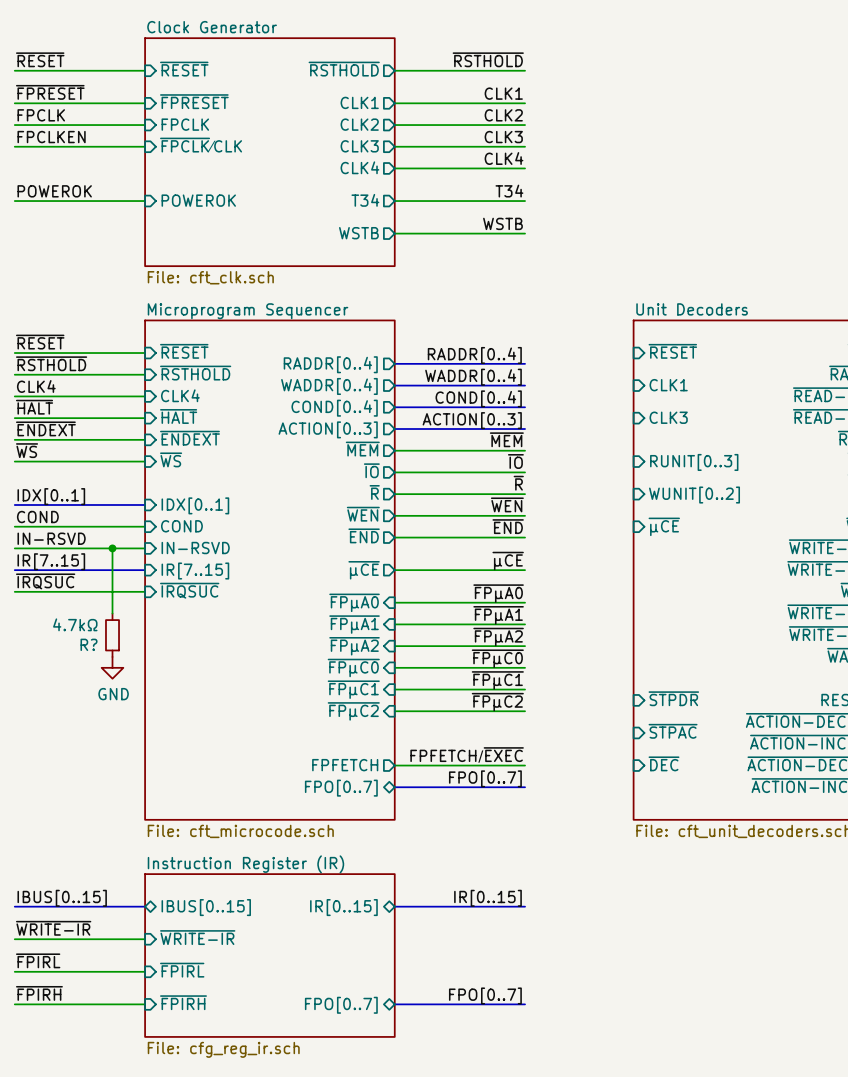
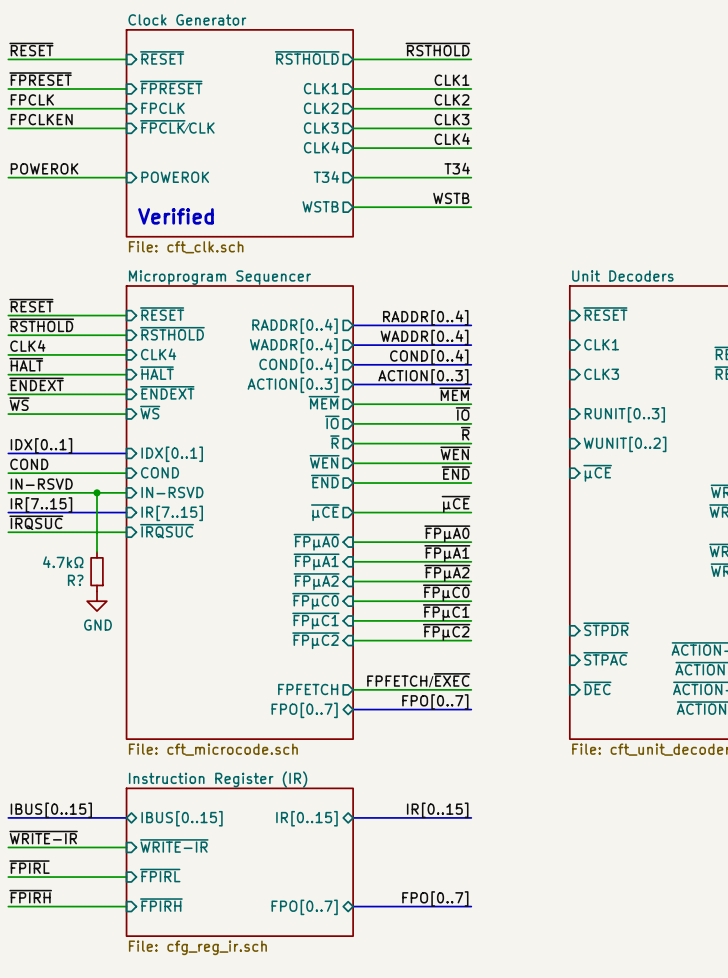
text: none -> Verified (175, 216)

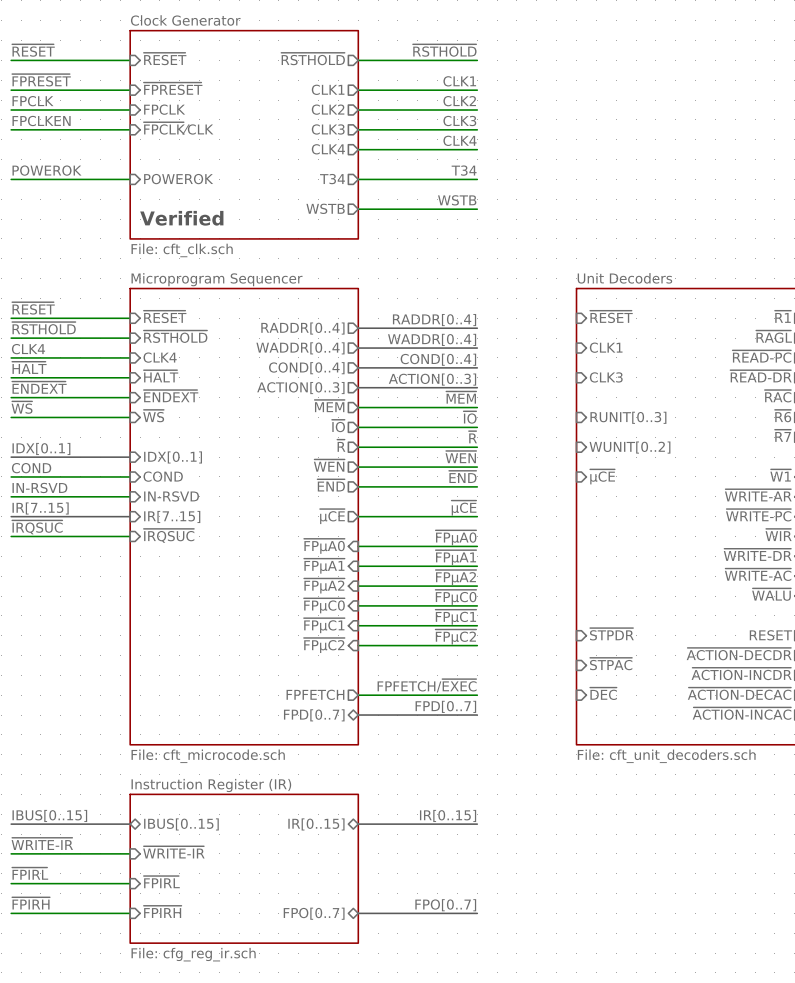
wire: (96, 492) (96, 551) -> none
junction: (96, 492) -> none
R?: 4.7kΩ (96, 571) -> none
power symbol: GND (96, 601) -> none
label: FPO[0..7] (435, 701) -> FPD[0..7] (445, 706)
sheet pin: FPO[0..7] (304, 710) -> FPD[0..7] (314, 715)

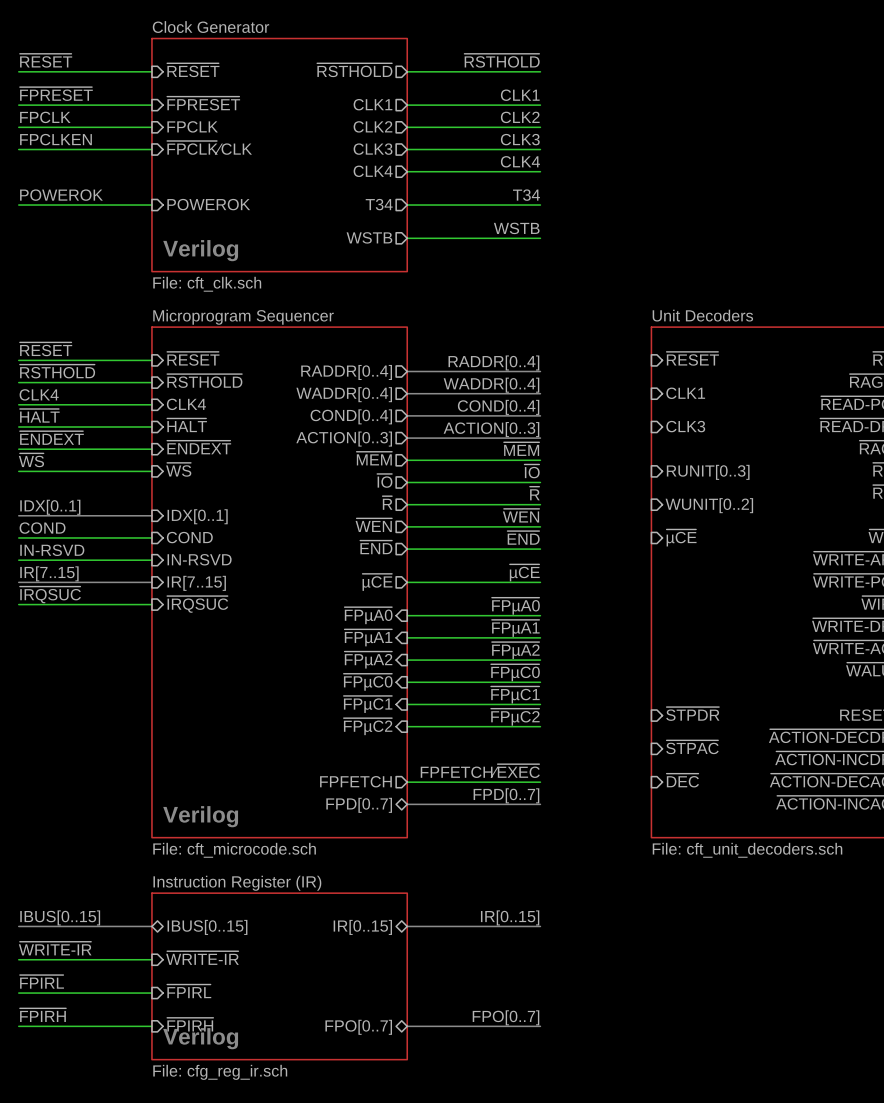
text: Verified (181, 218) -> Verilog (200, 250)
text: none -> Verilog (200, 816)
text: none -> Verilog (200, 1038)

